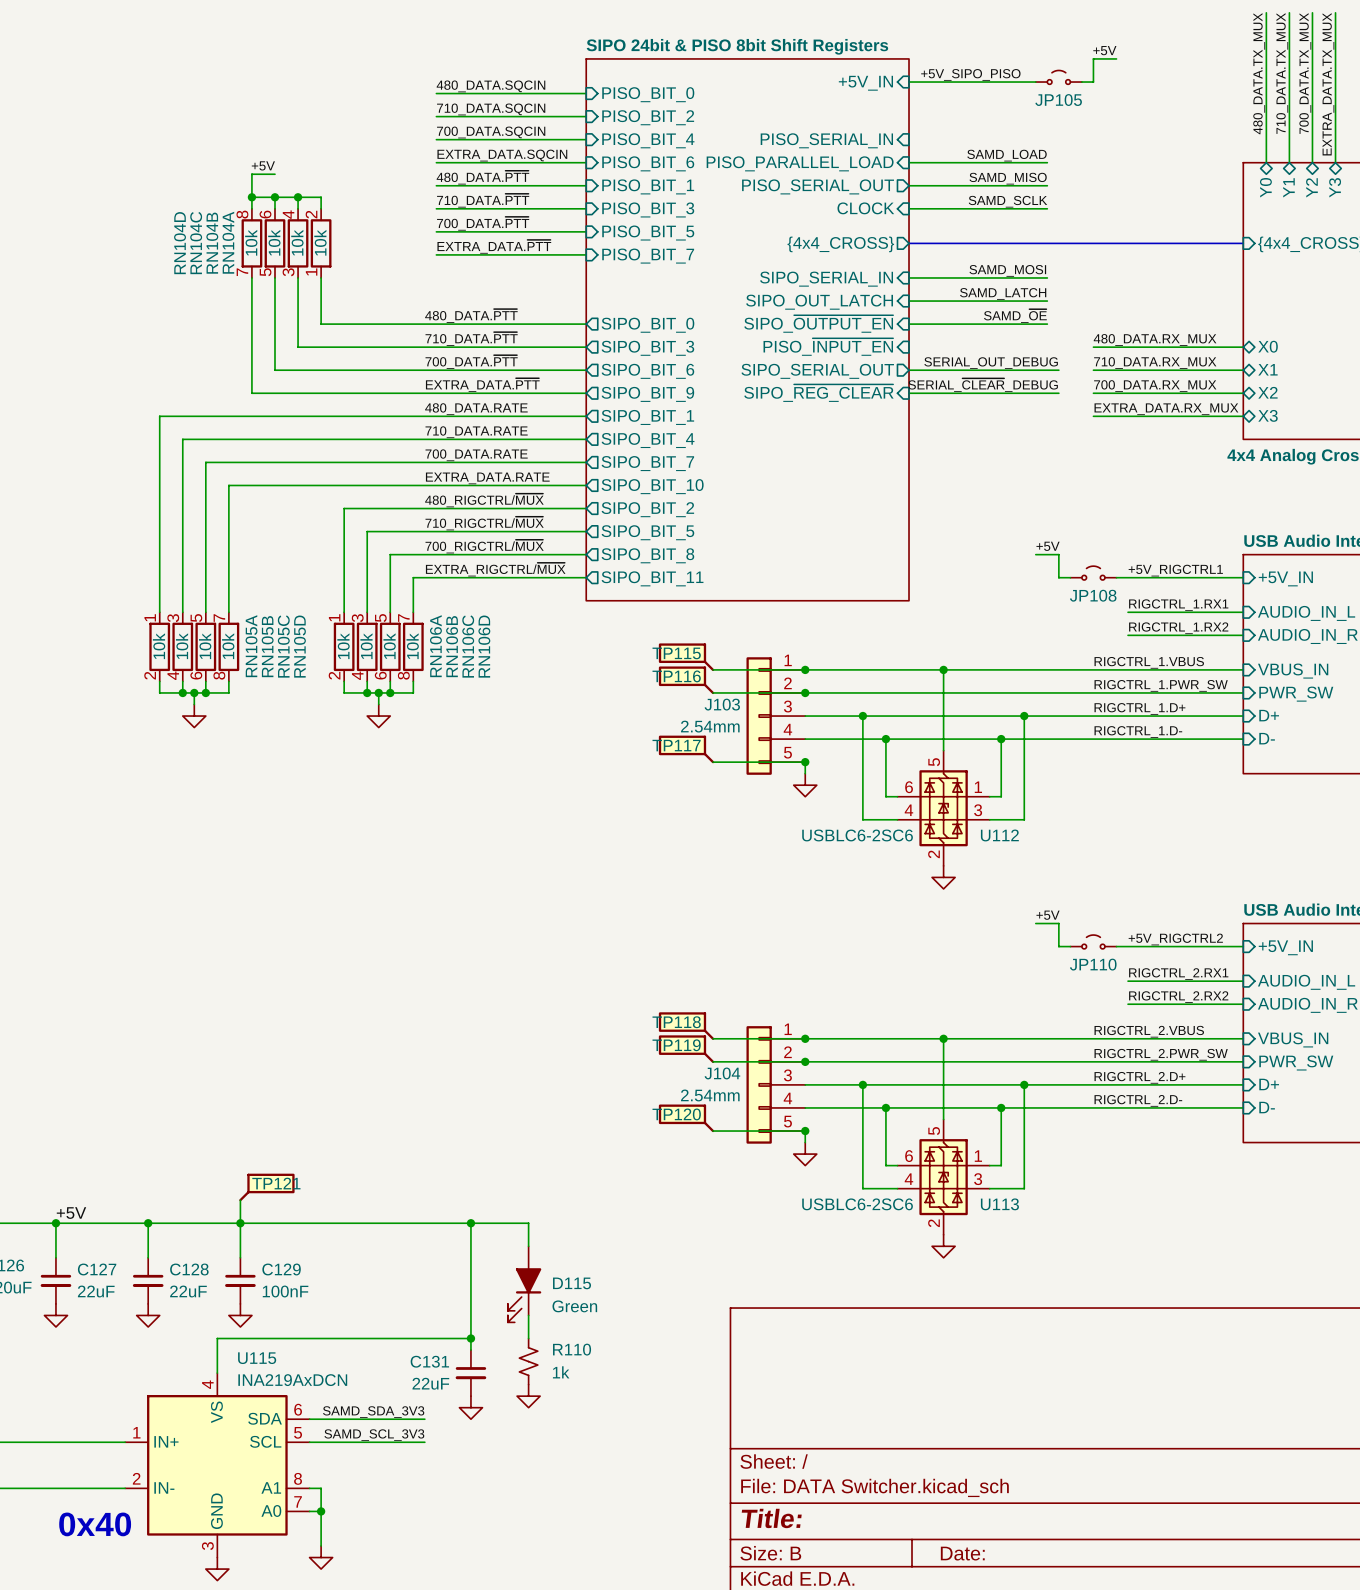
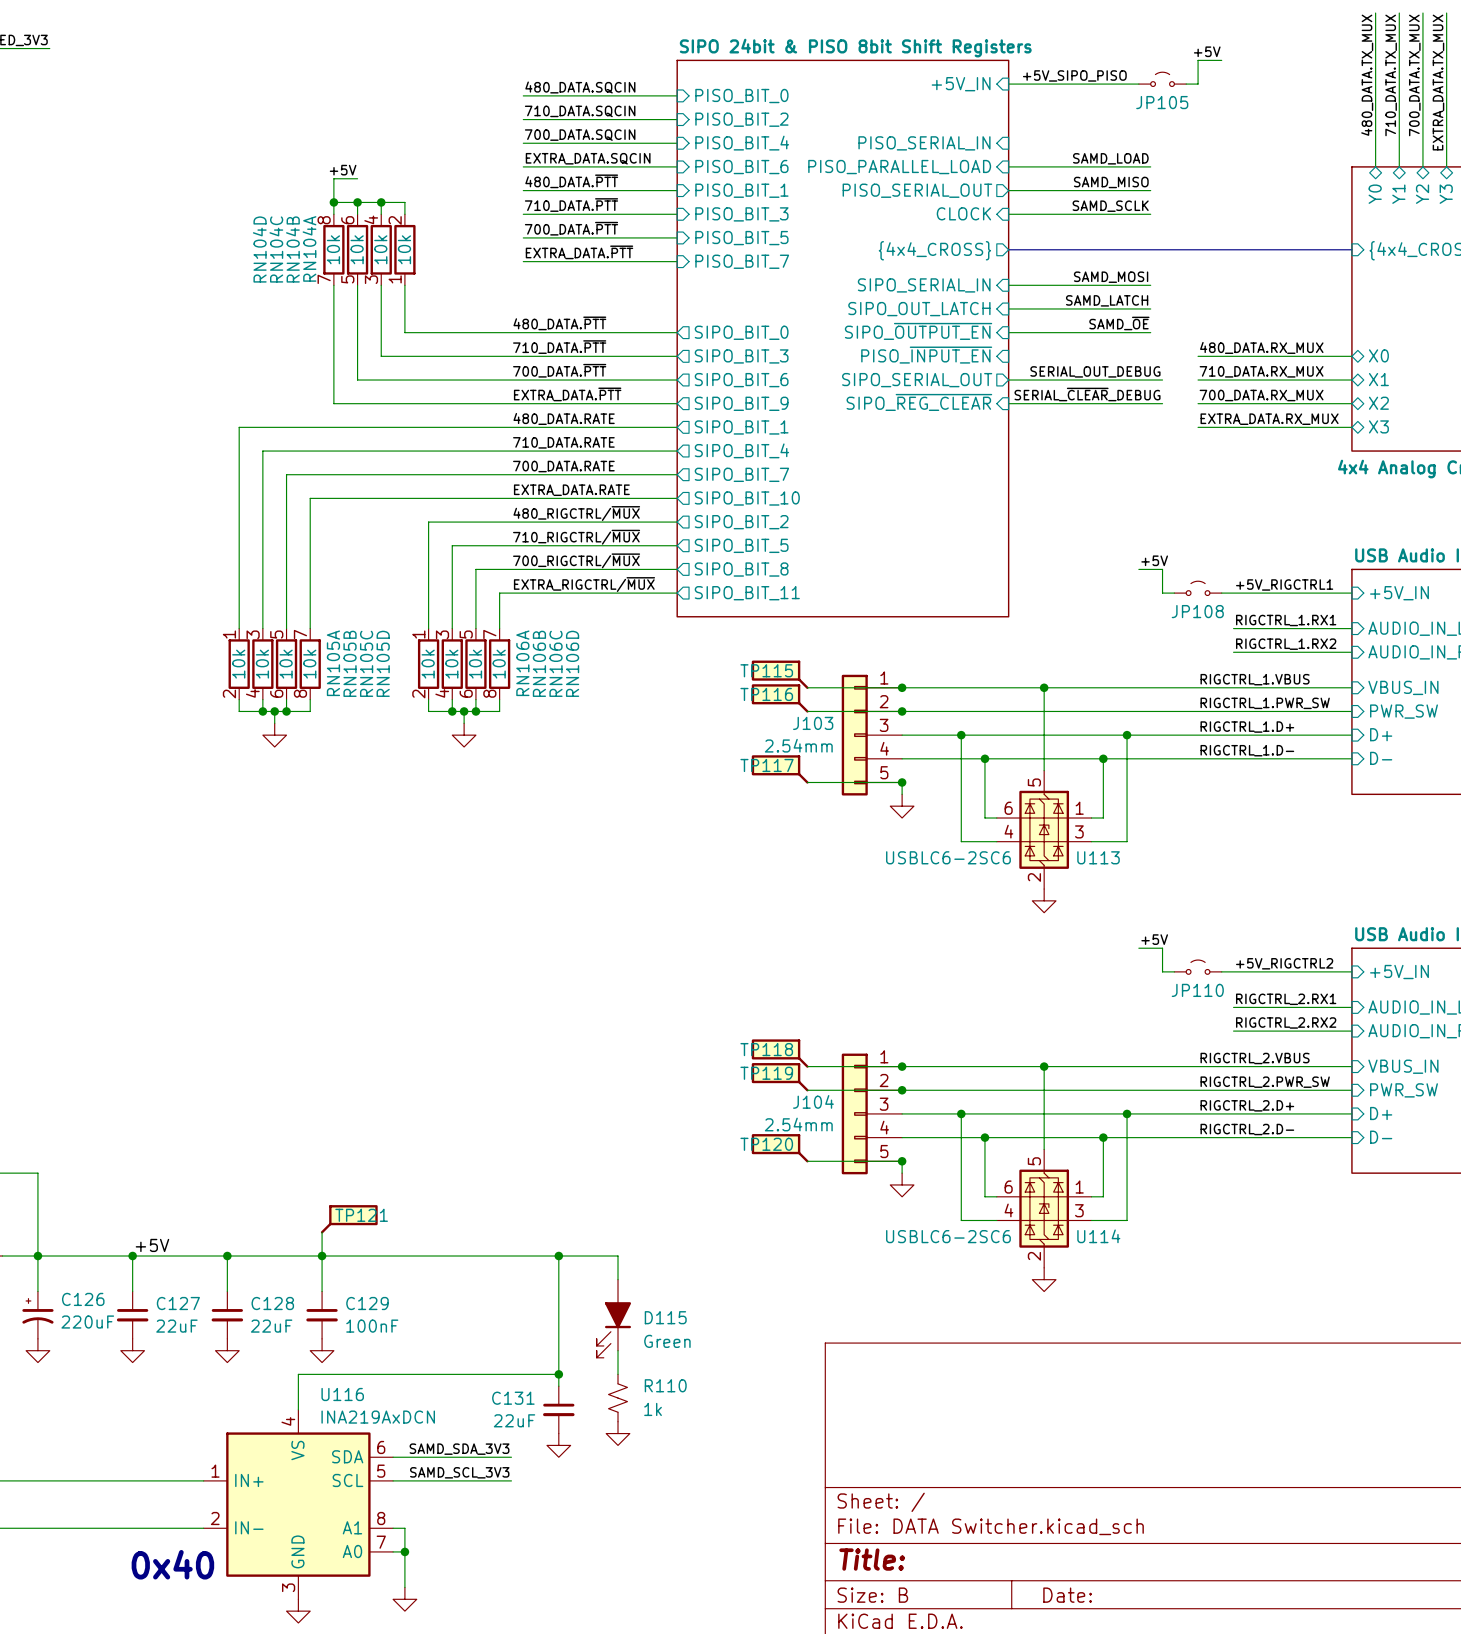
U112 name: U112 (999, 835) -> U113 (1098, 857)
U113 name: U113 (999, 1204) -> U114 (1098, 1236)
U115 name: U115 (257, 1358) -> U116 (342, 1394)

